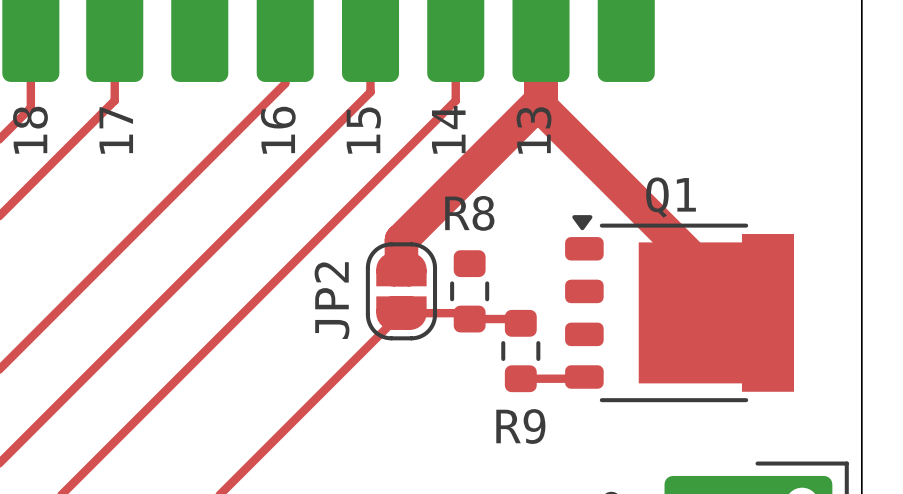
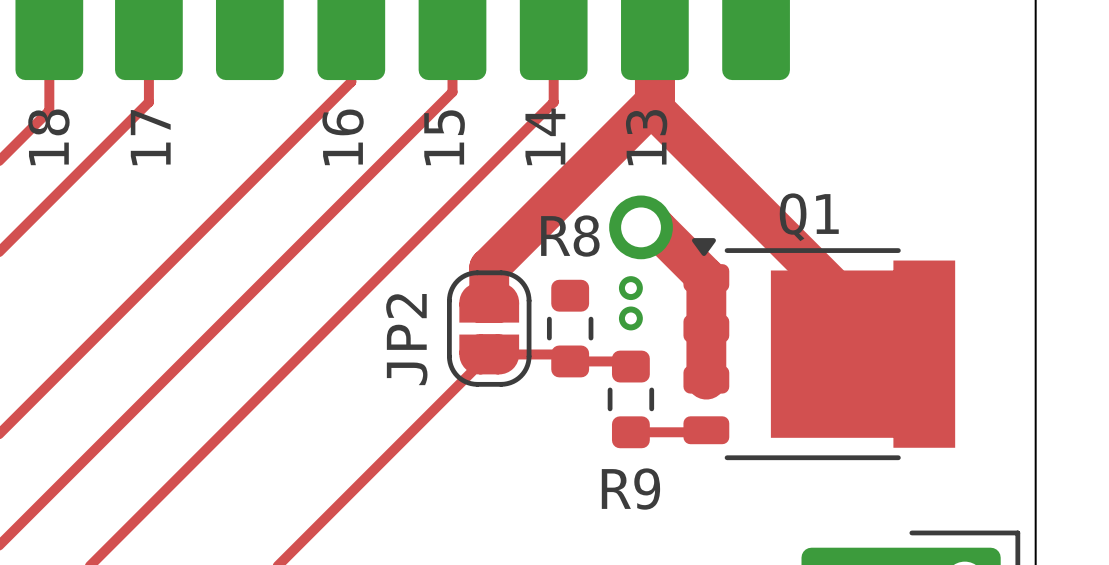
track: none -> (641, 227) (655, 227) (706, 278) (706, 379)
via: none -> (641, 227)
via: none -> (630, 288)
via: none -> (630, 318)

